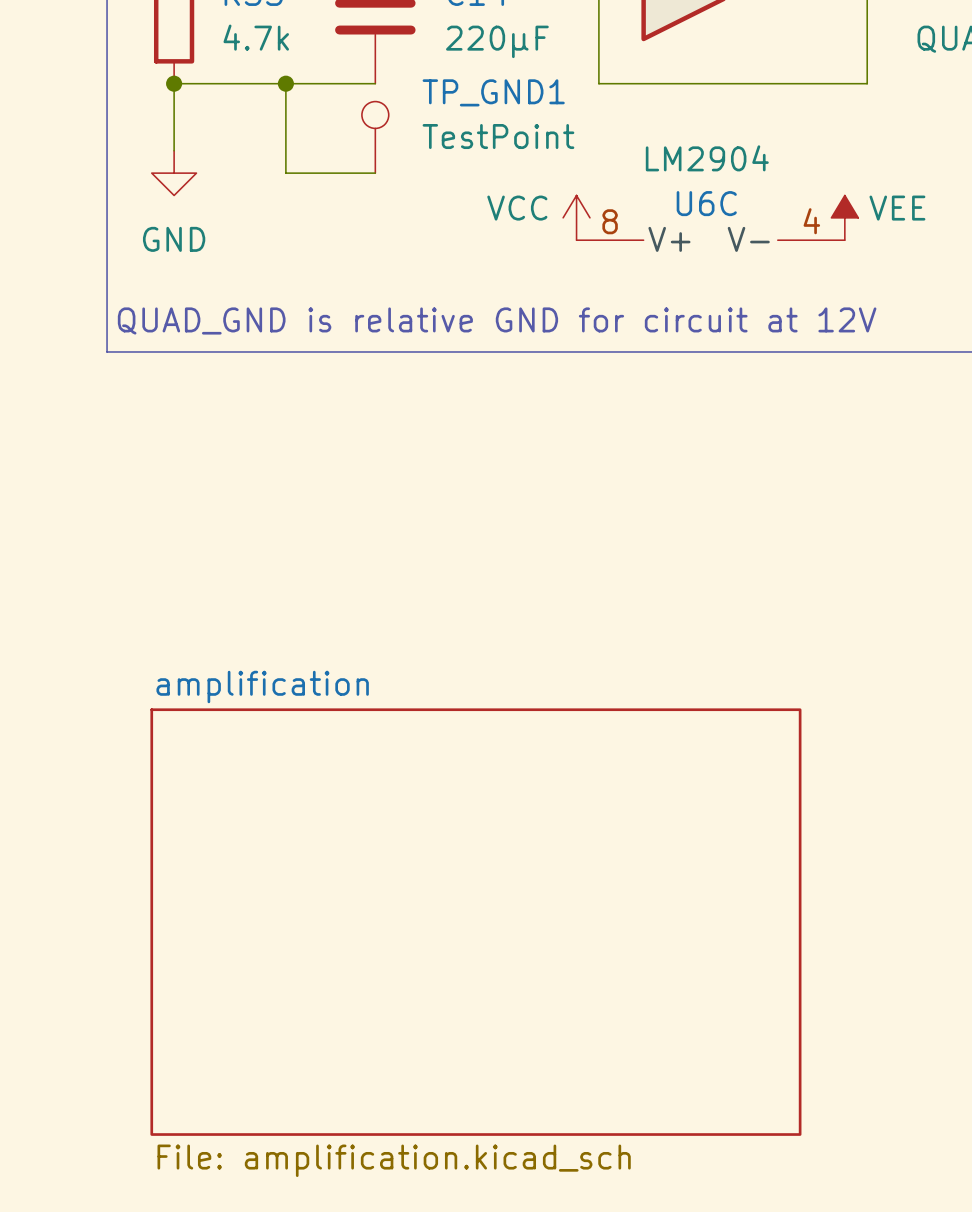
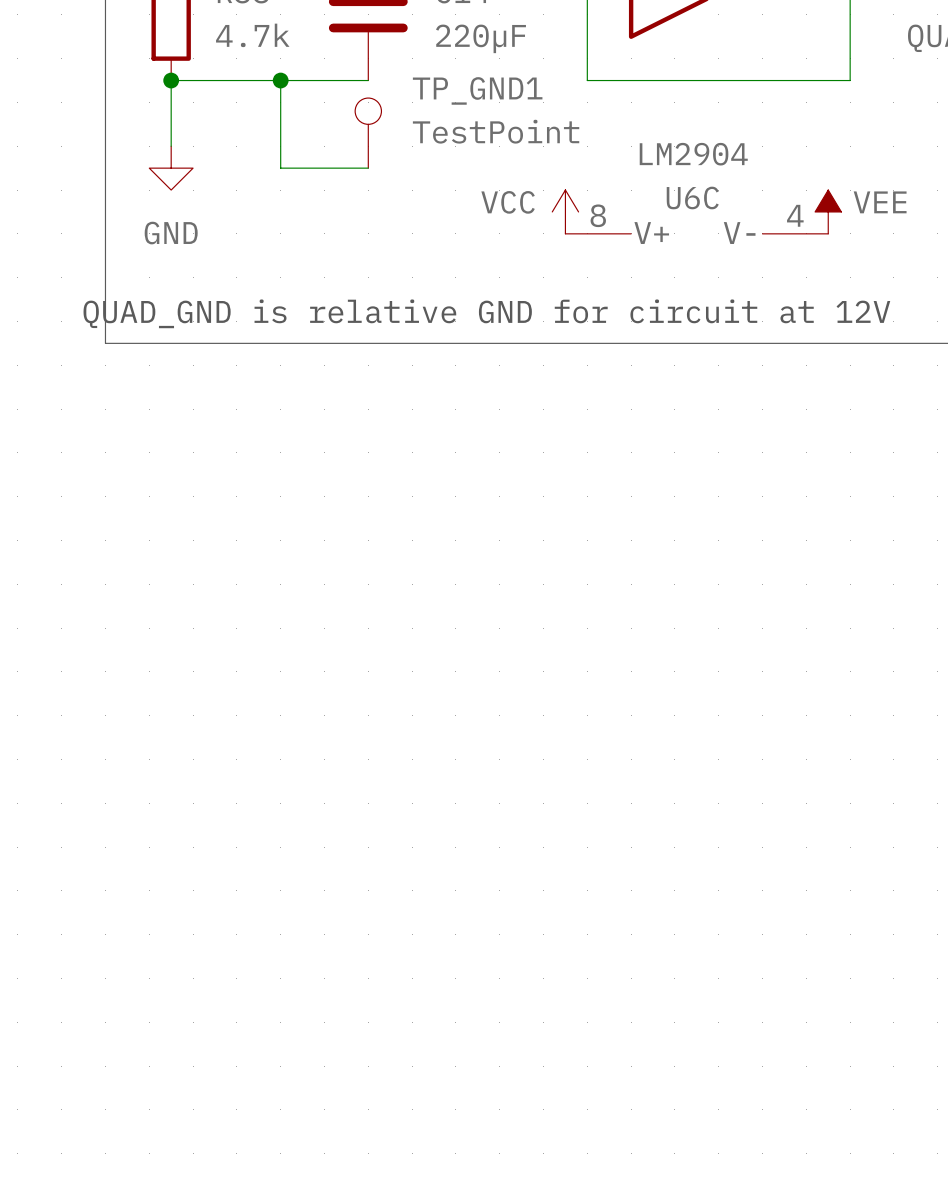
sheet amplification: File: amplification.kicad_sch (475, 922) -> none

